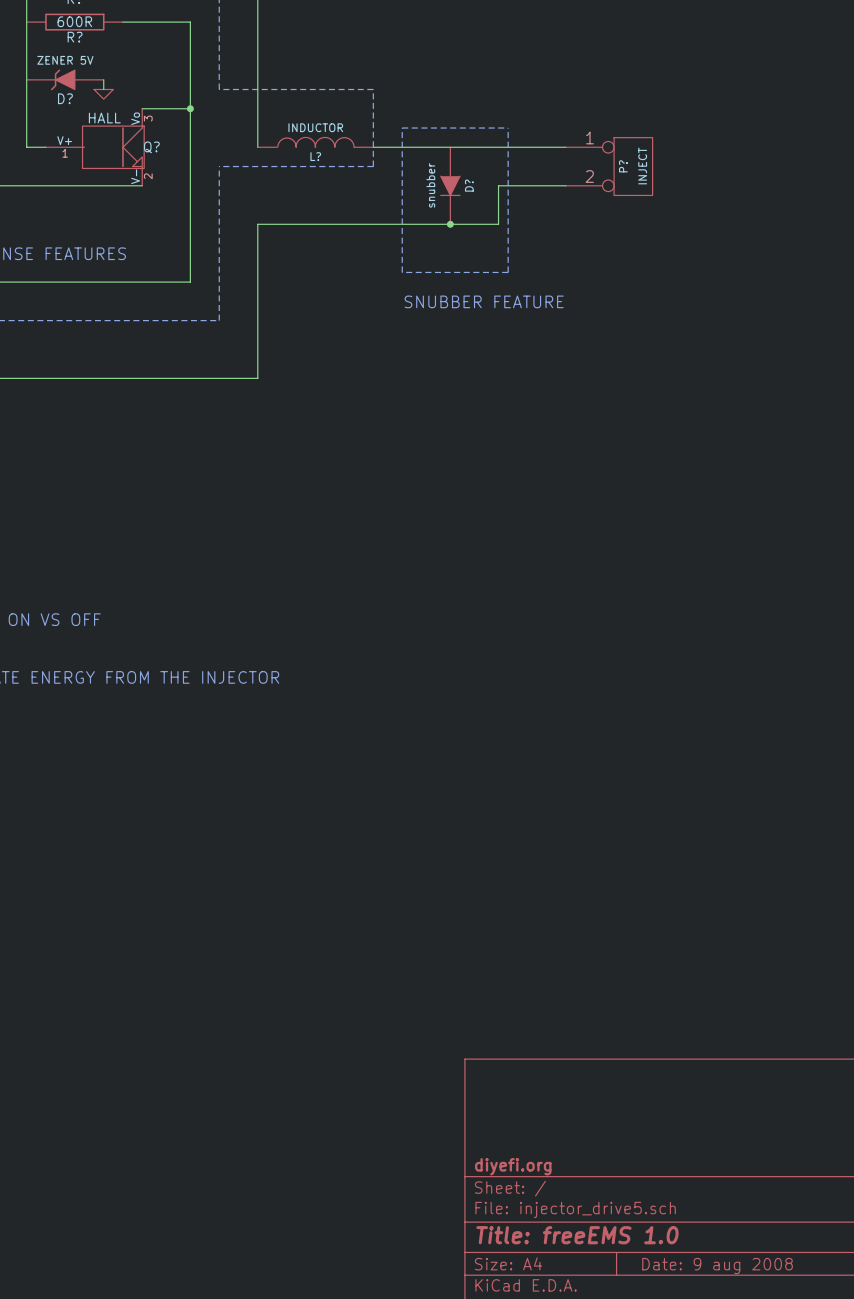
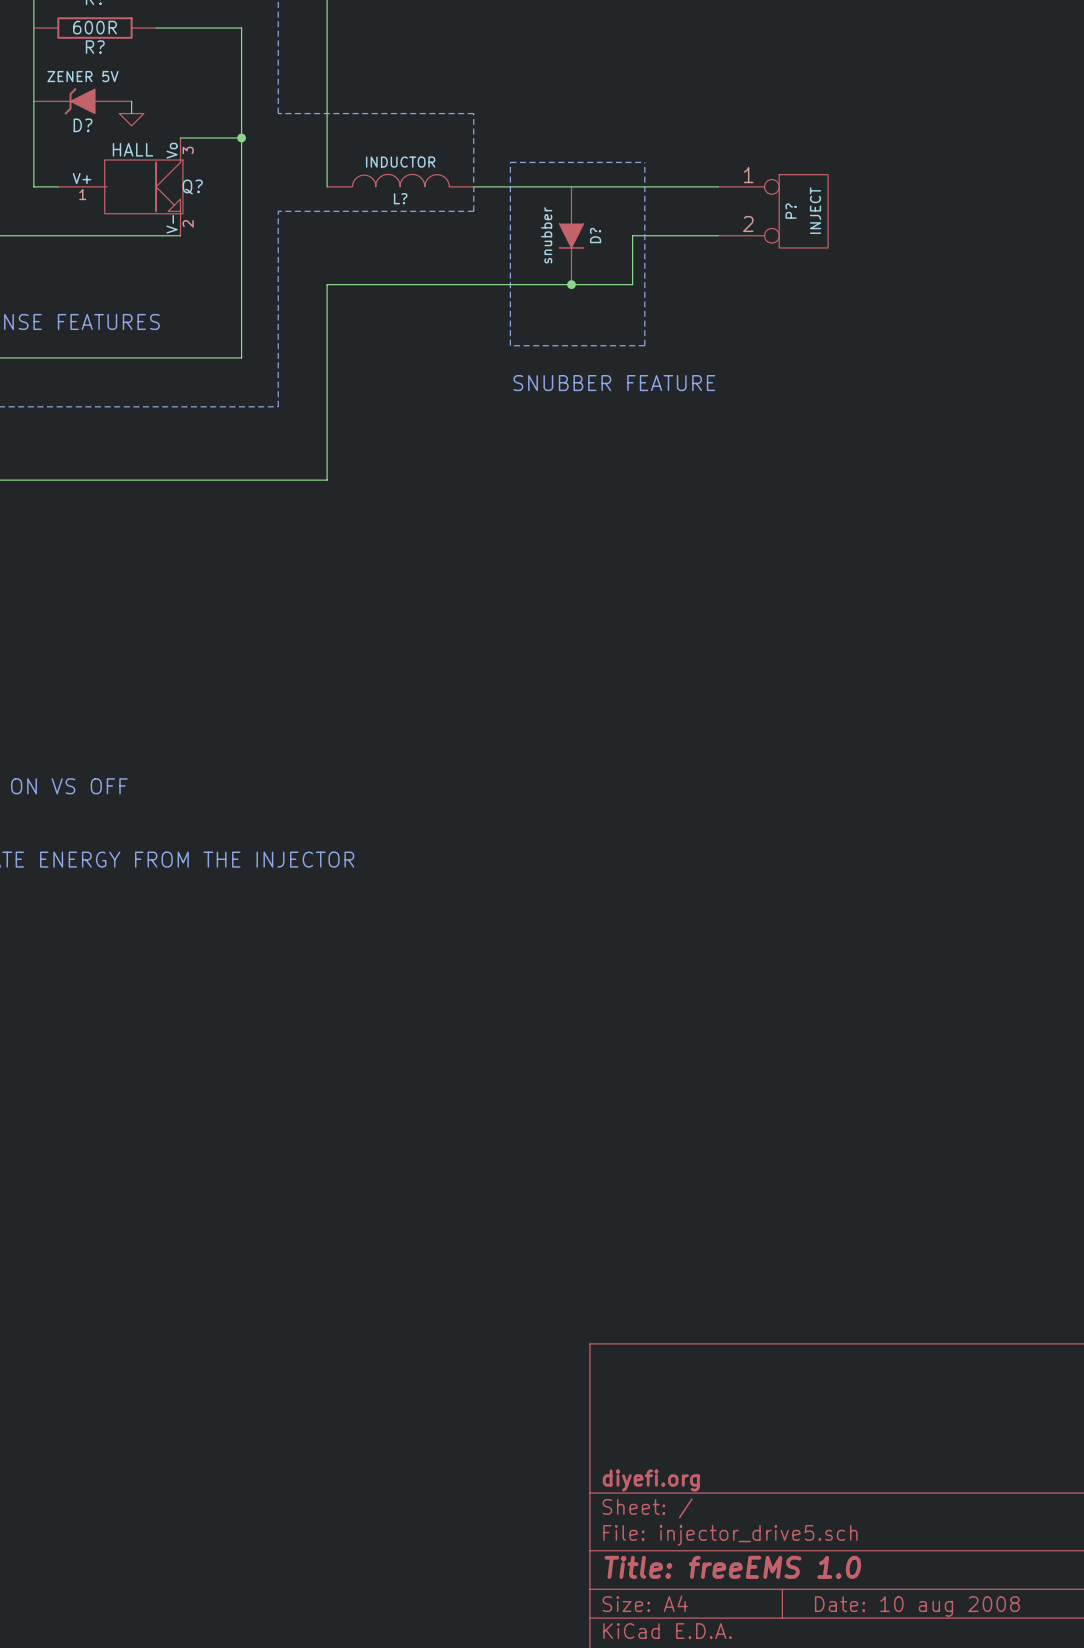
title block: Date: 9 aug 2008 (717, 1266) -> Date: 10 aug 2008 (917, 1606)

